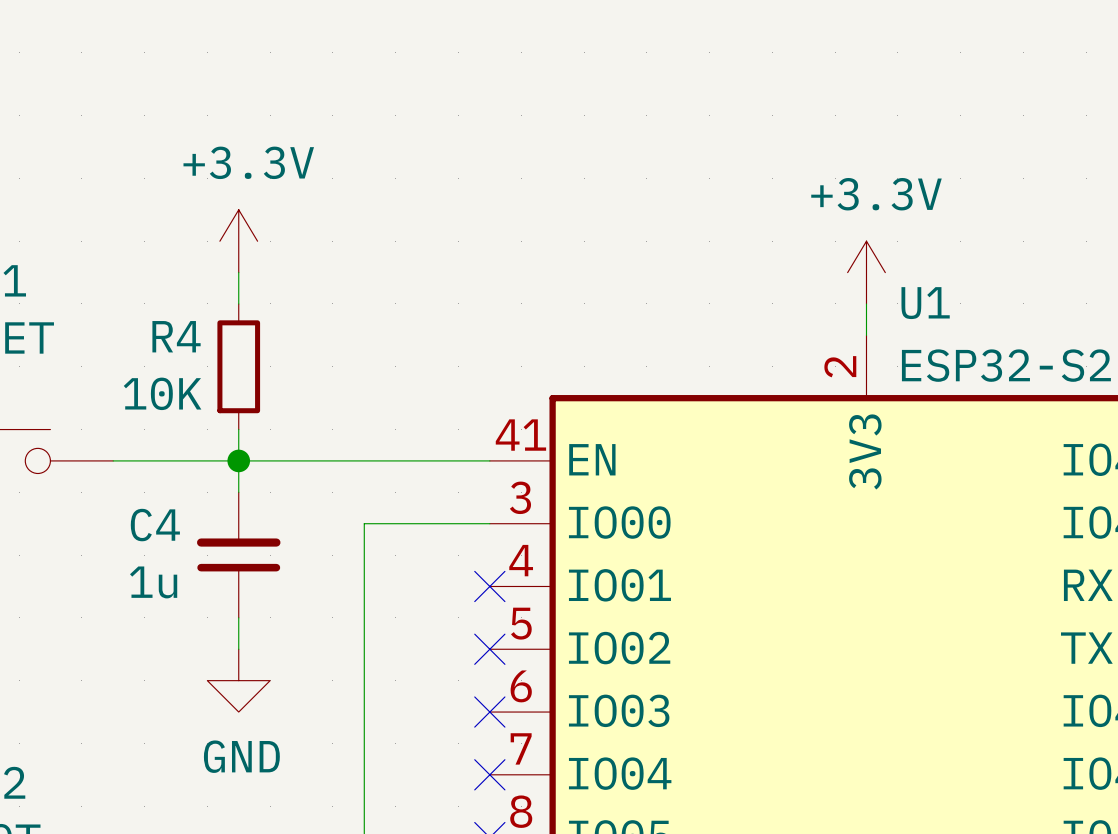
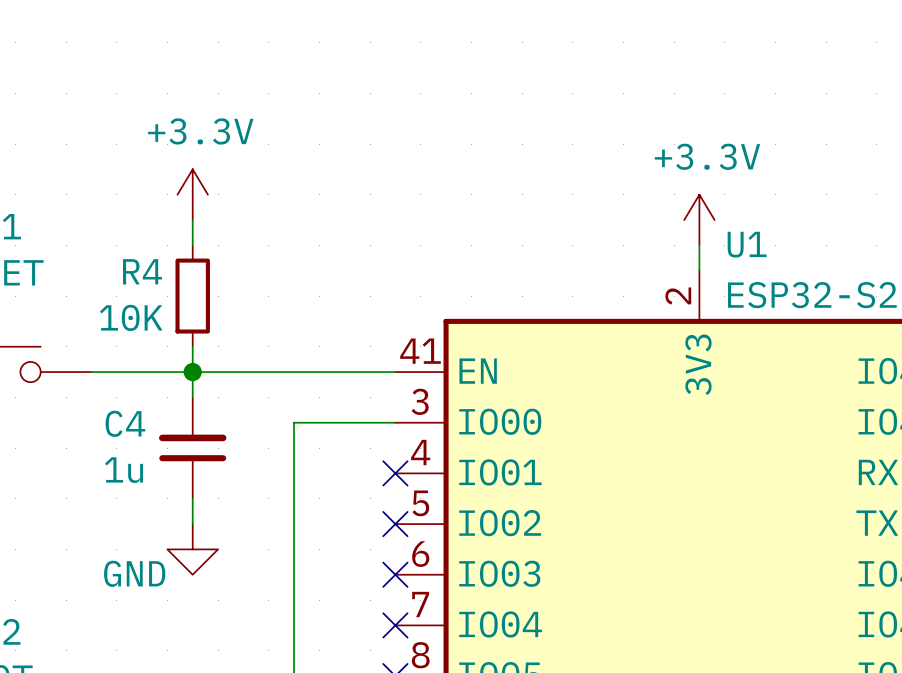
power symbol text position: GND (241, 756) -> GND (134, 573)

